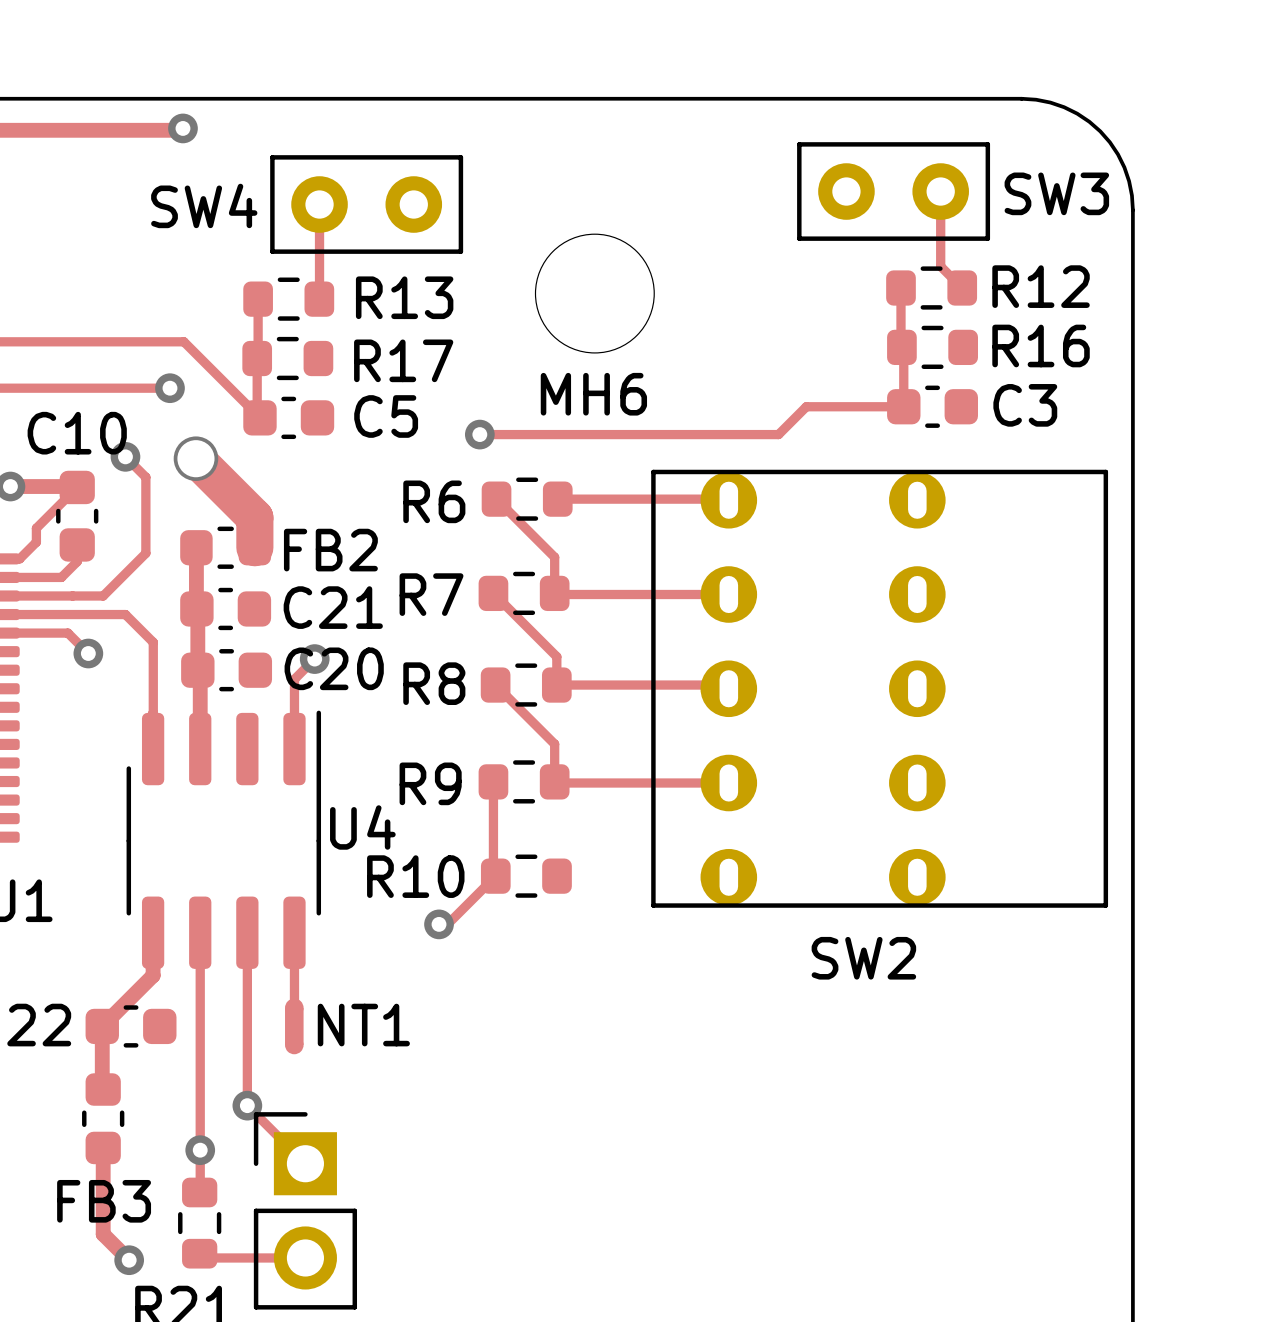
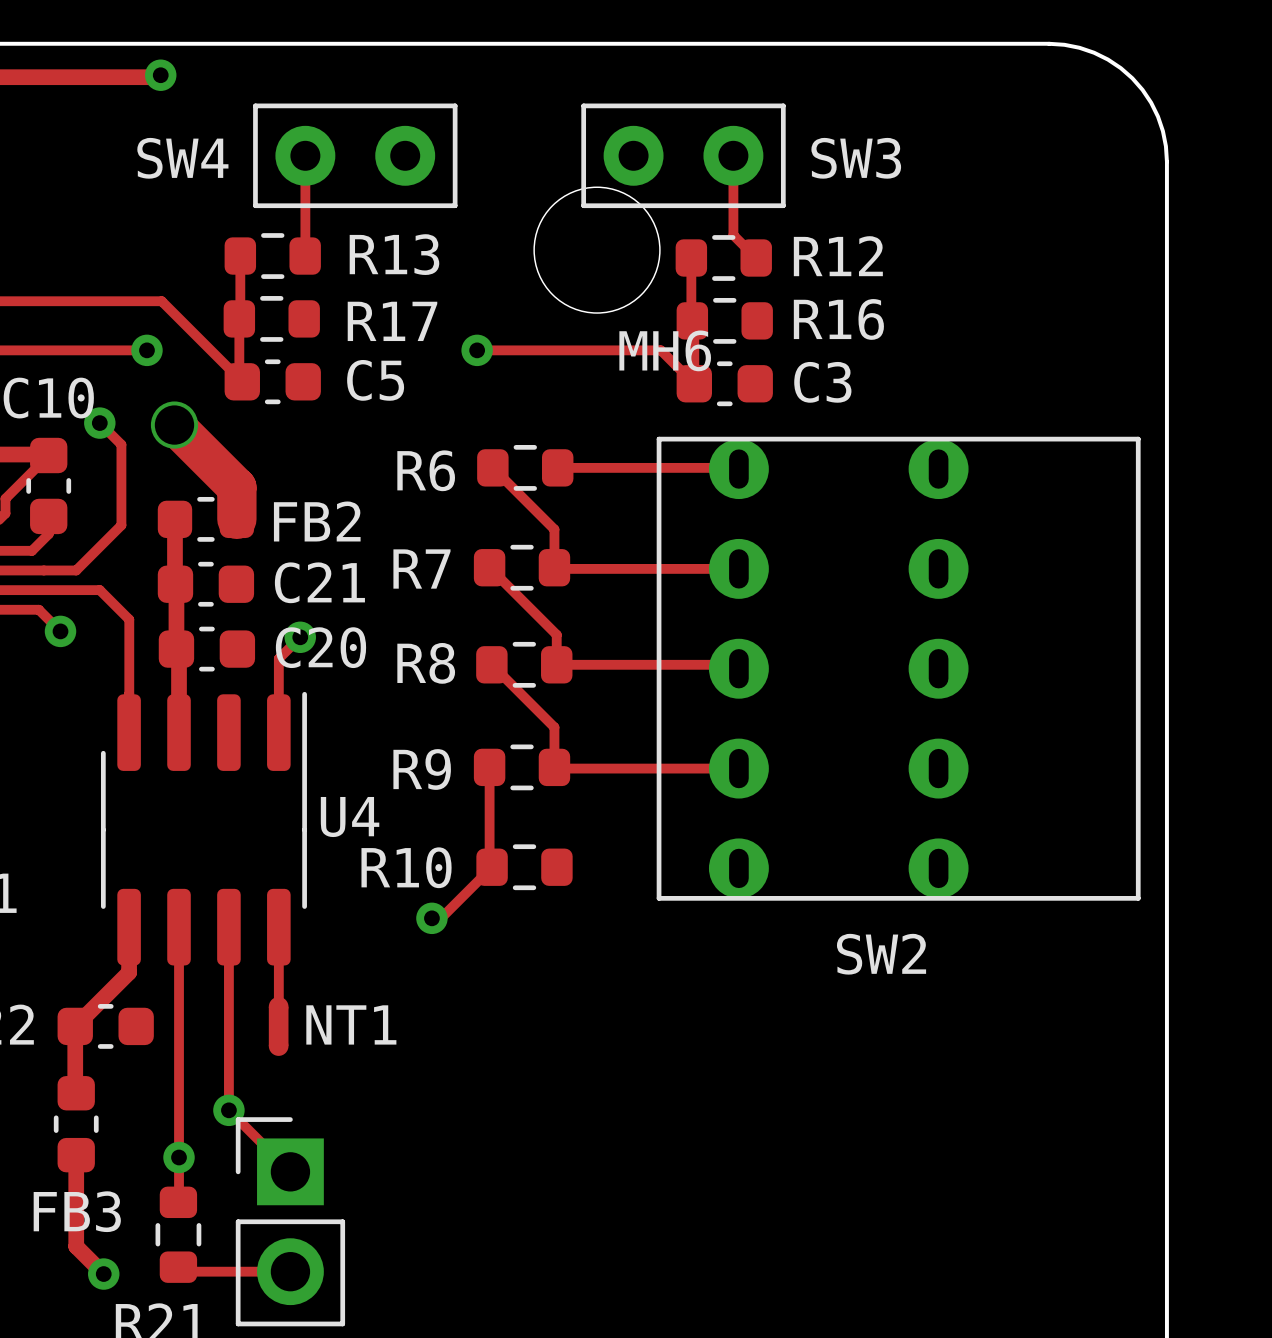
SW3 position: (893, 191) -> (683, 155)
track: (940, 191) (940, 266) (962, 288) (972, 277) -> (733, 155) (733, 235) (756, 257) (766, 247)
track: (900, 288) (903, 406) (806, 406) (778, 434) (479, 434) -> none
R12 position: (931, 288) -> (723, 257)
track: none -> (691, 257) (694, 383) (660, 350) (477, 350)
R16 position: (932, 347) -> (724, 320)
MH6 name position: MH6 (593, 394) -> MH6 (665, 350)
C3 position: (932, 406) -> (724, 383)
via position: (479, 434) -> (477, 350)

